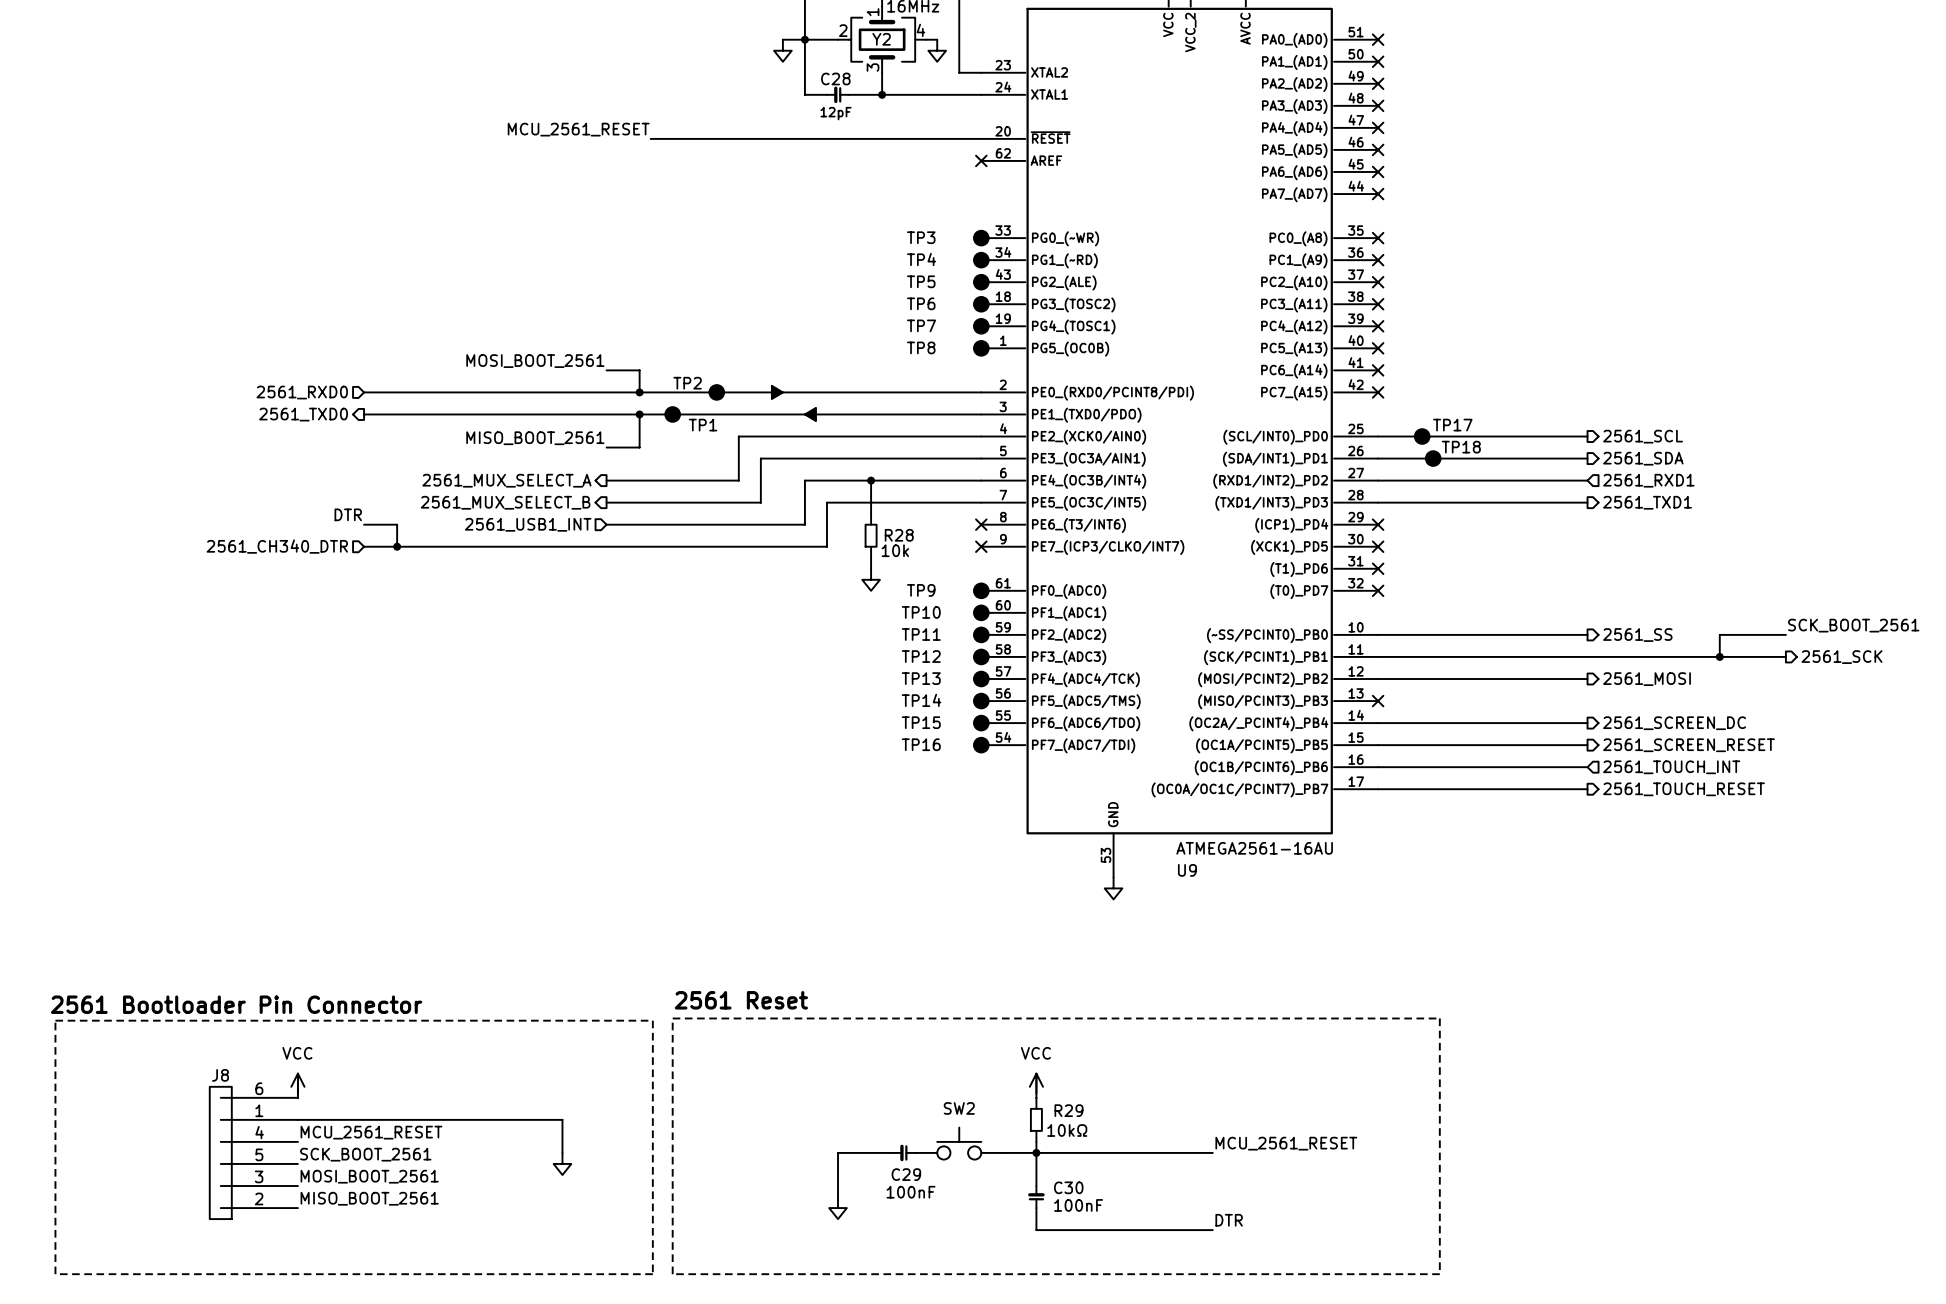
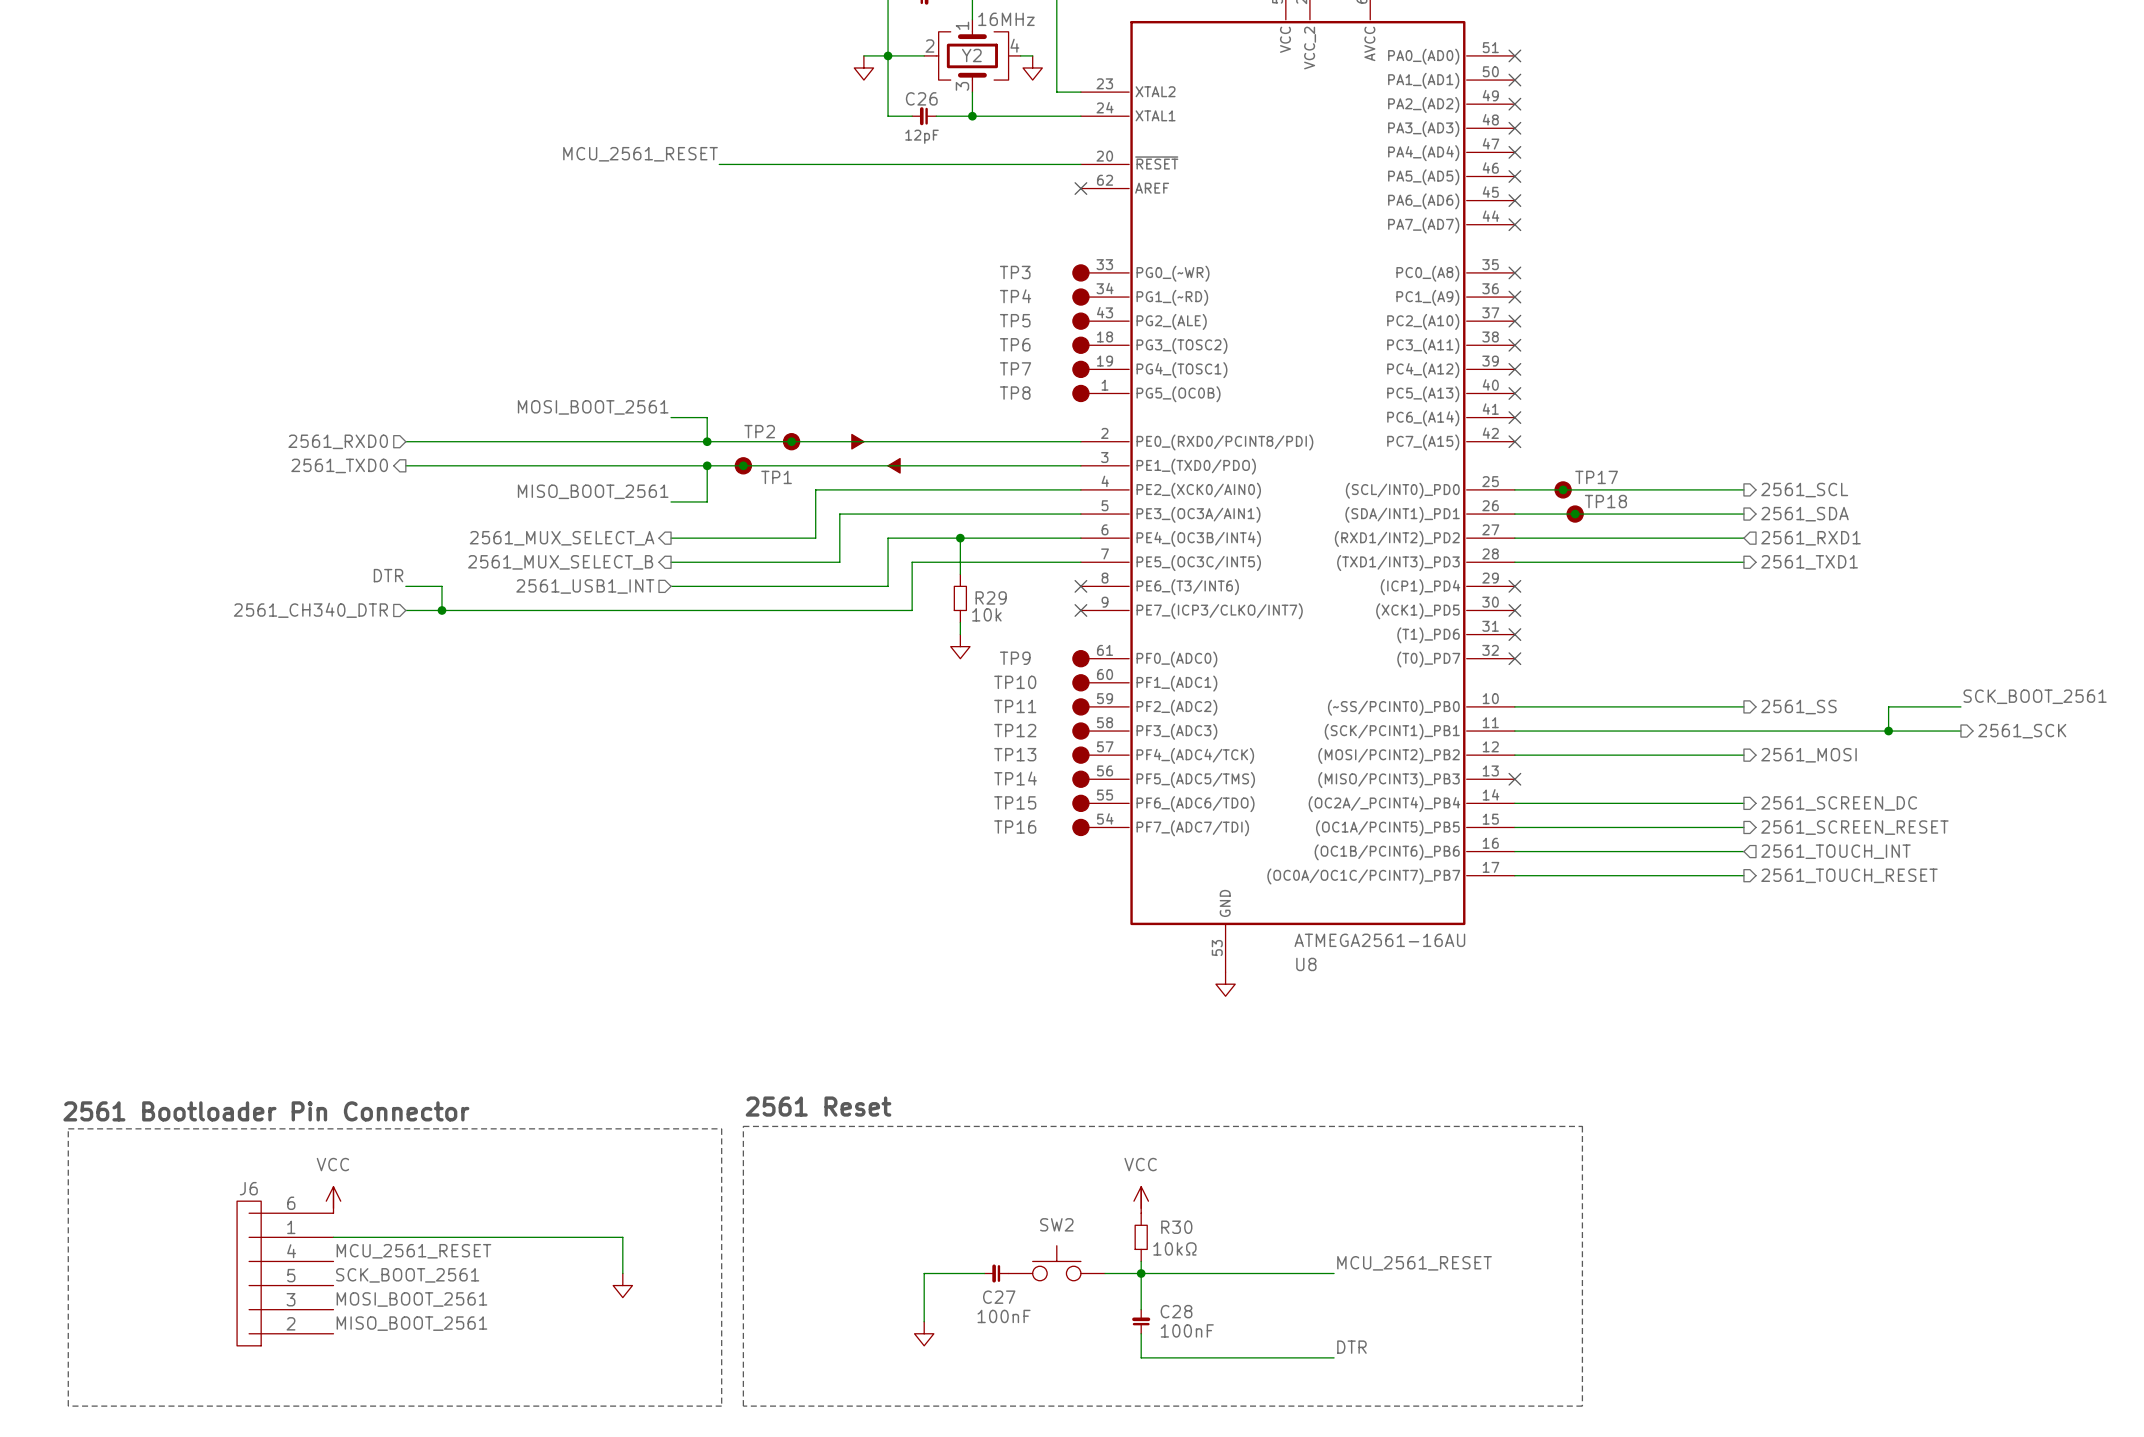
C28 name: C28 (835, 78) -> C26 (921, 98)
R28 name: R28 (899, 535) -> R29 (991, 597)
U9 name: U9 (1187, 870) -> U8 (1306, 964)
J8 name: J8 (220, 1075) -> J6 (248, 1188)
R29 name: R29 (1068, 1110) -> R30 (1176, 1227)
C29 name: C29 (906, 1174) -> C27 (999, 1297)
C30 name: C30 (1068, 1187) -> C28 (1176, 1311)

